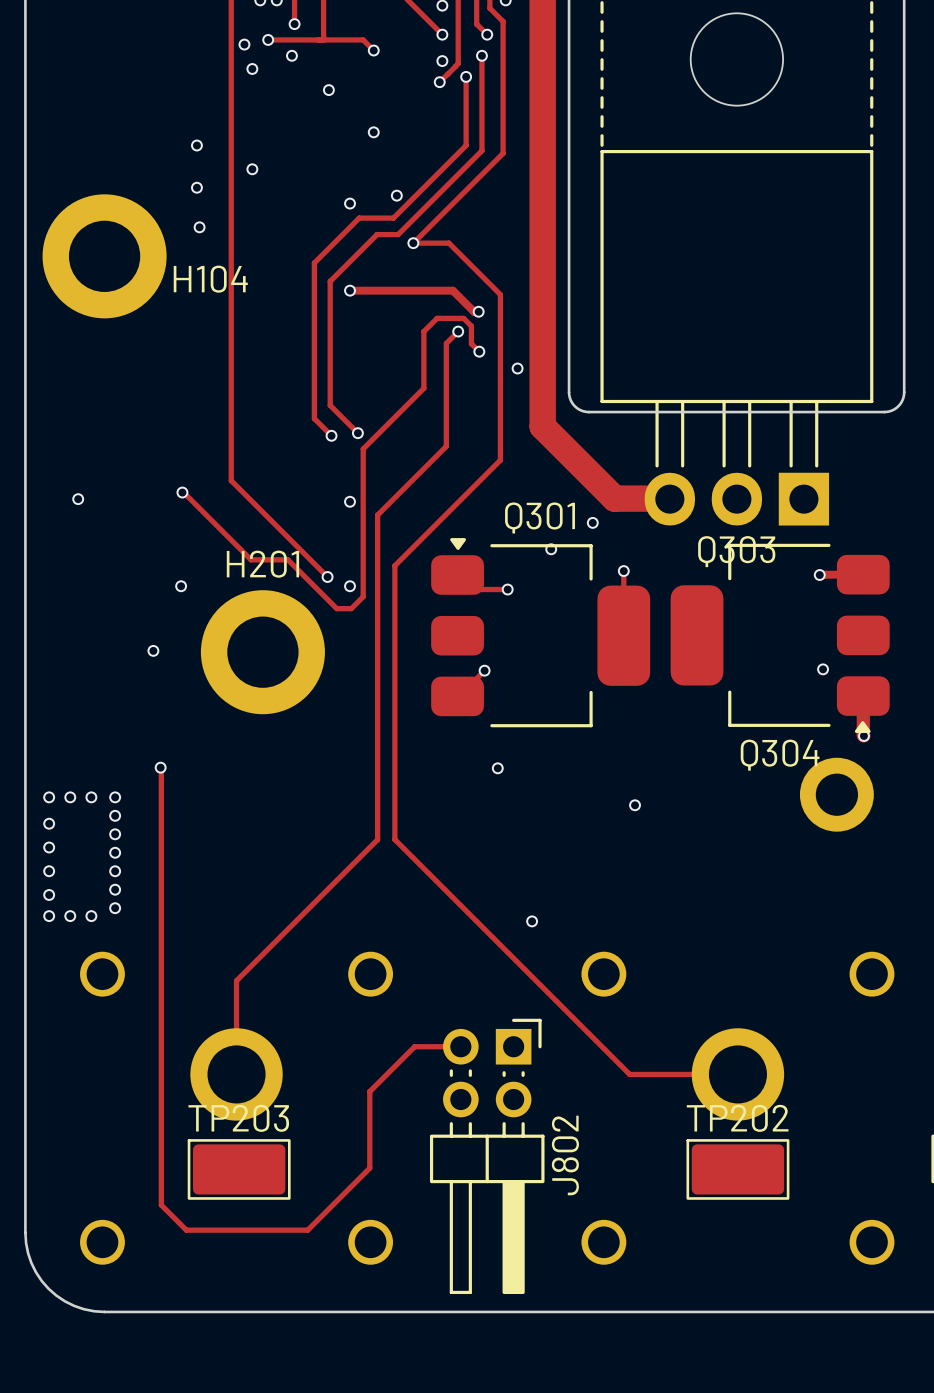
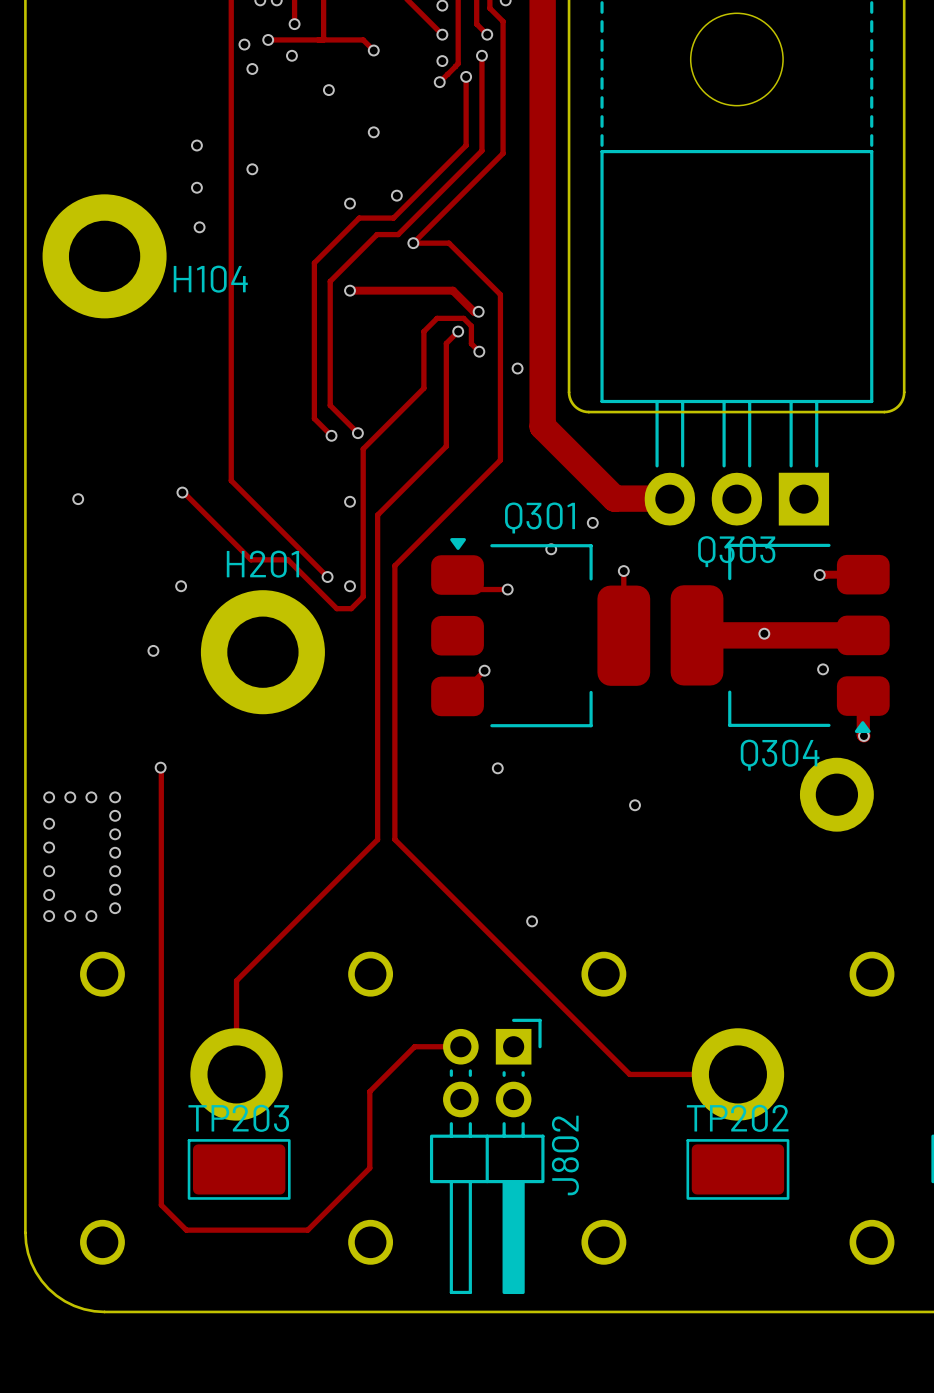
via: none -> (764, 633)
track: none -> (697, 635) (863, 635)

